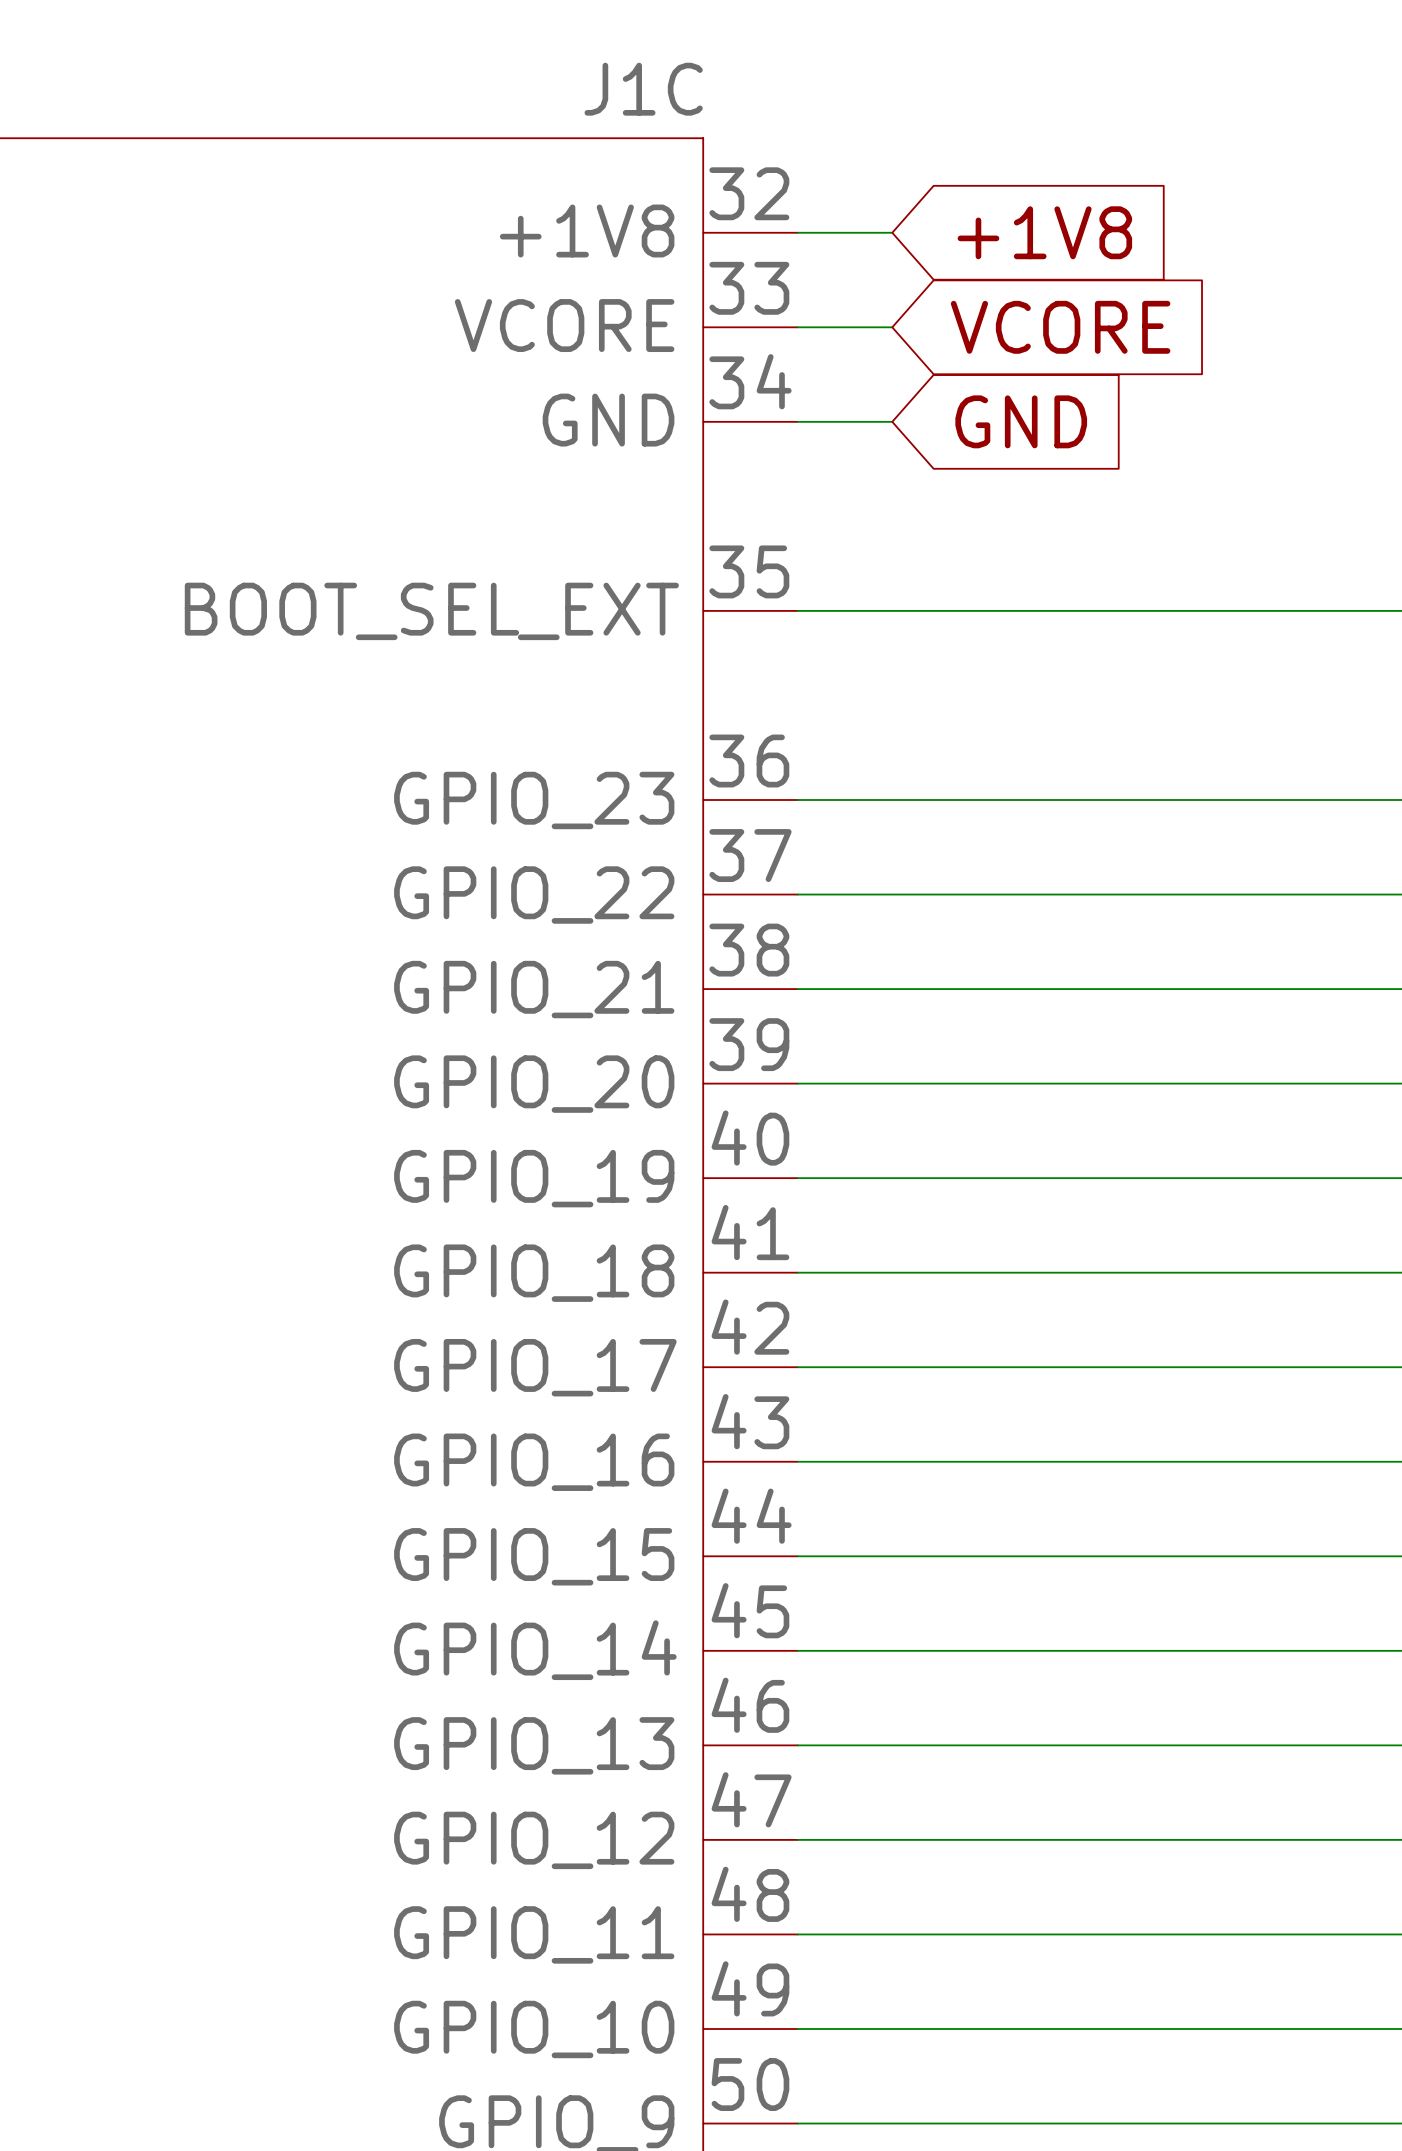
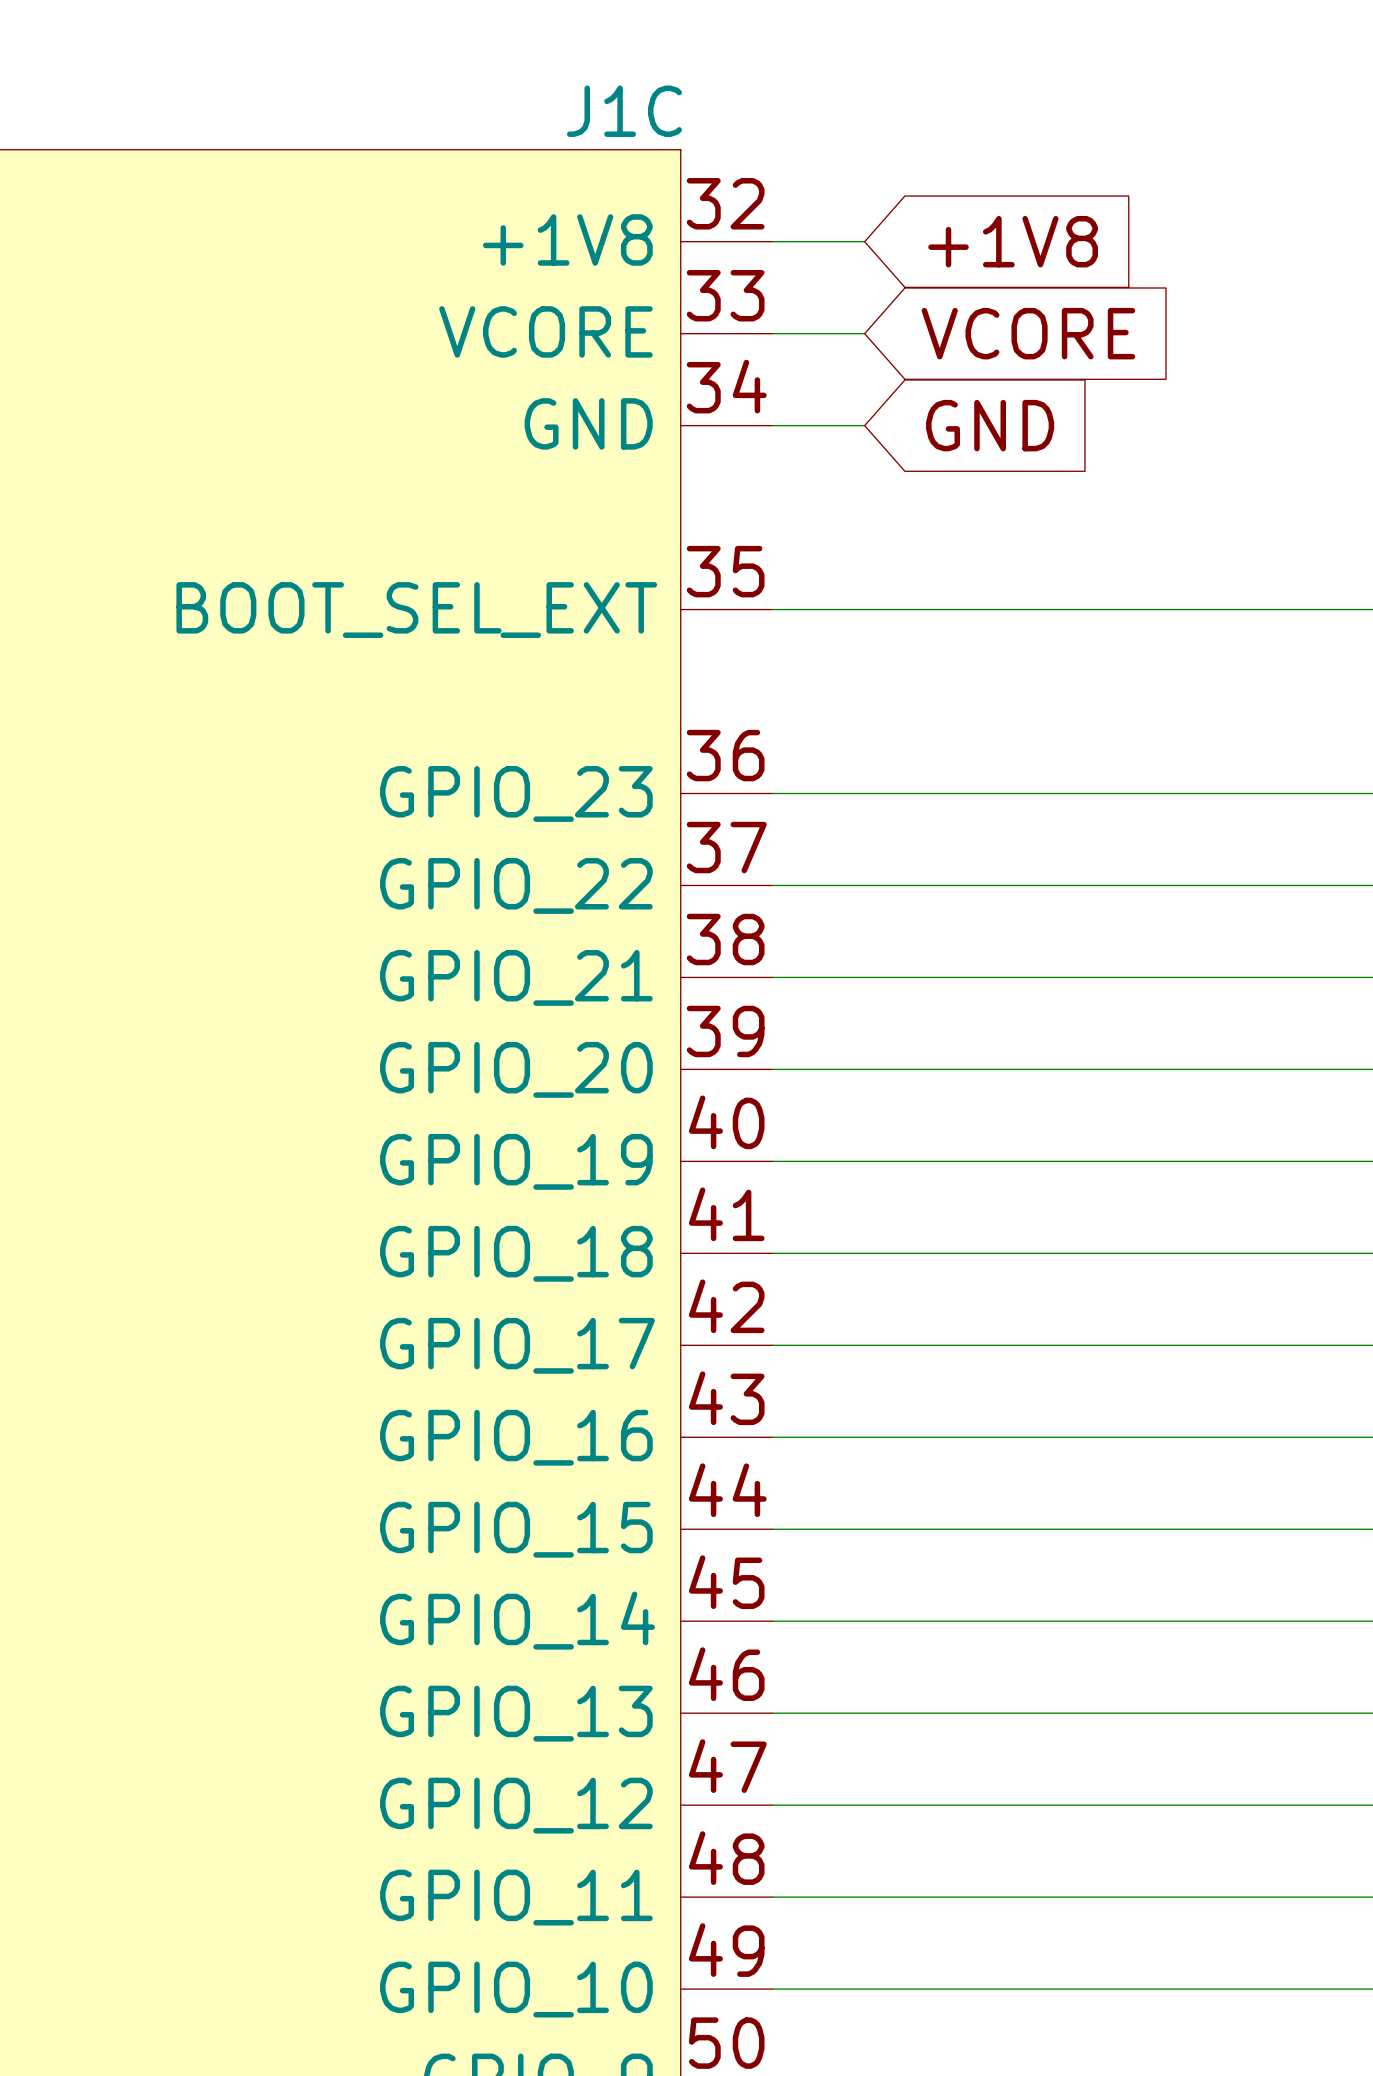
J1C name position: J1C (643, 89) -> J1C (624, 111)

